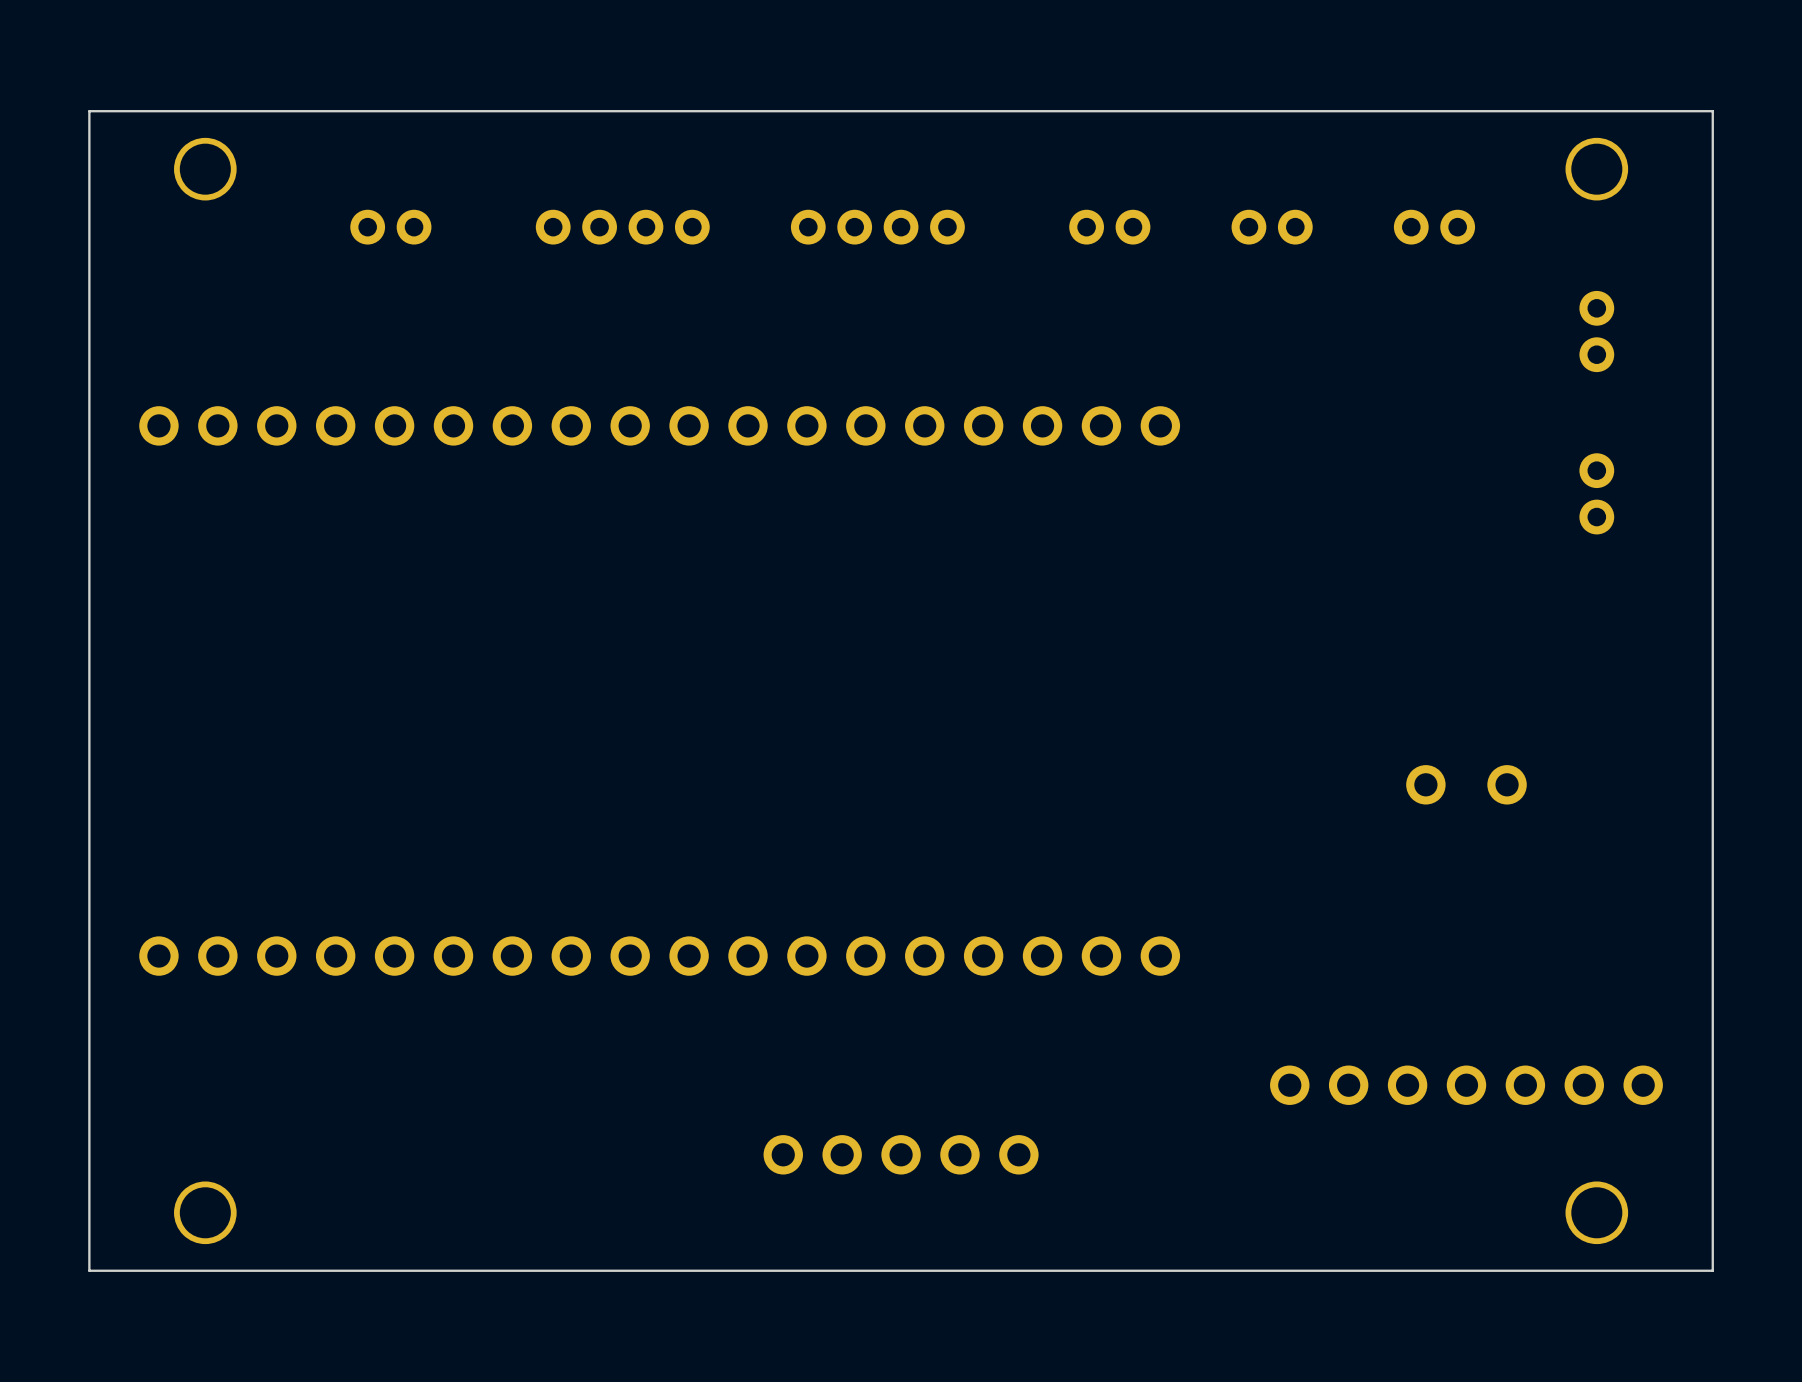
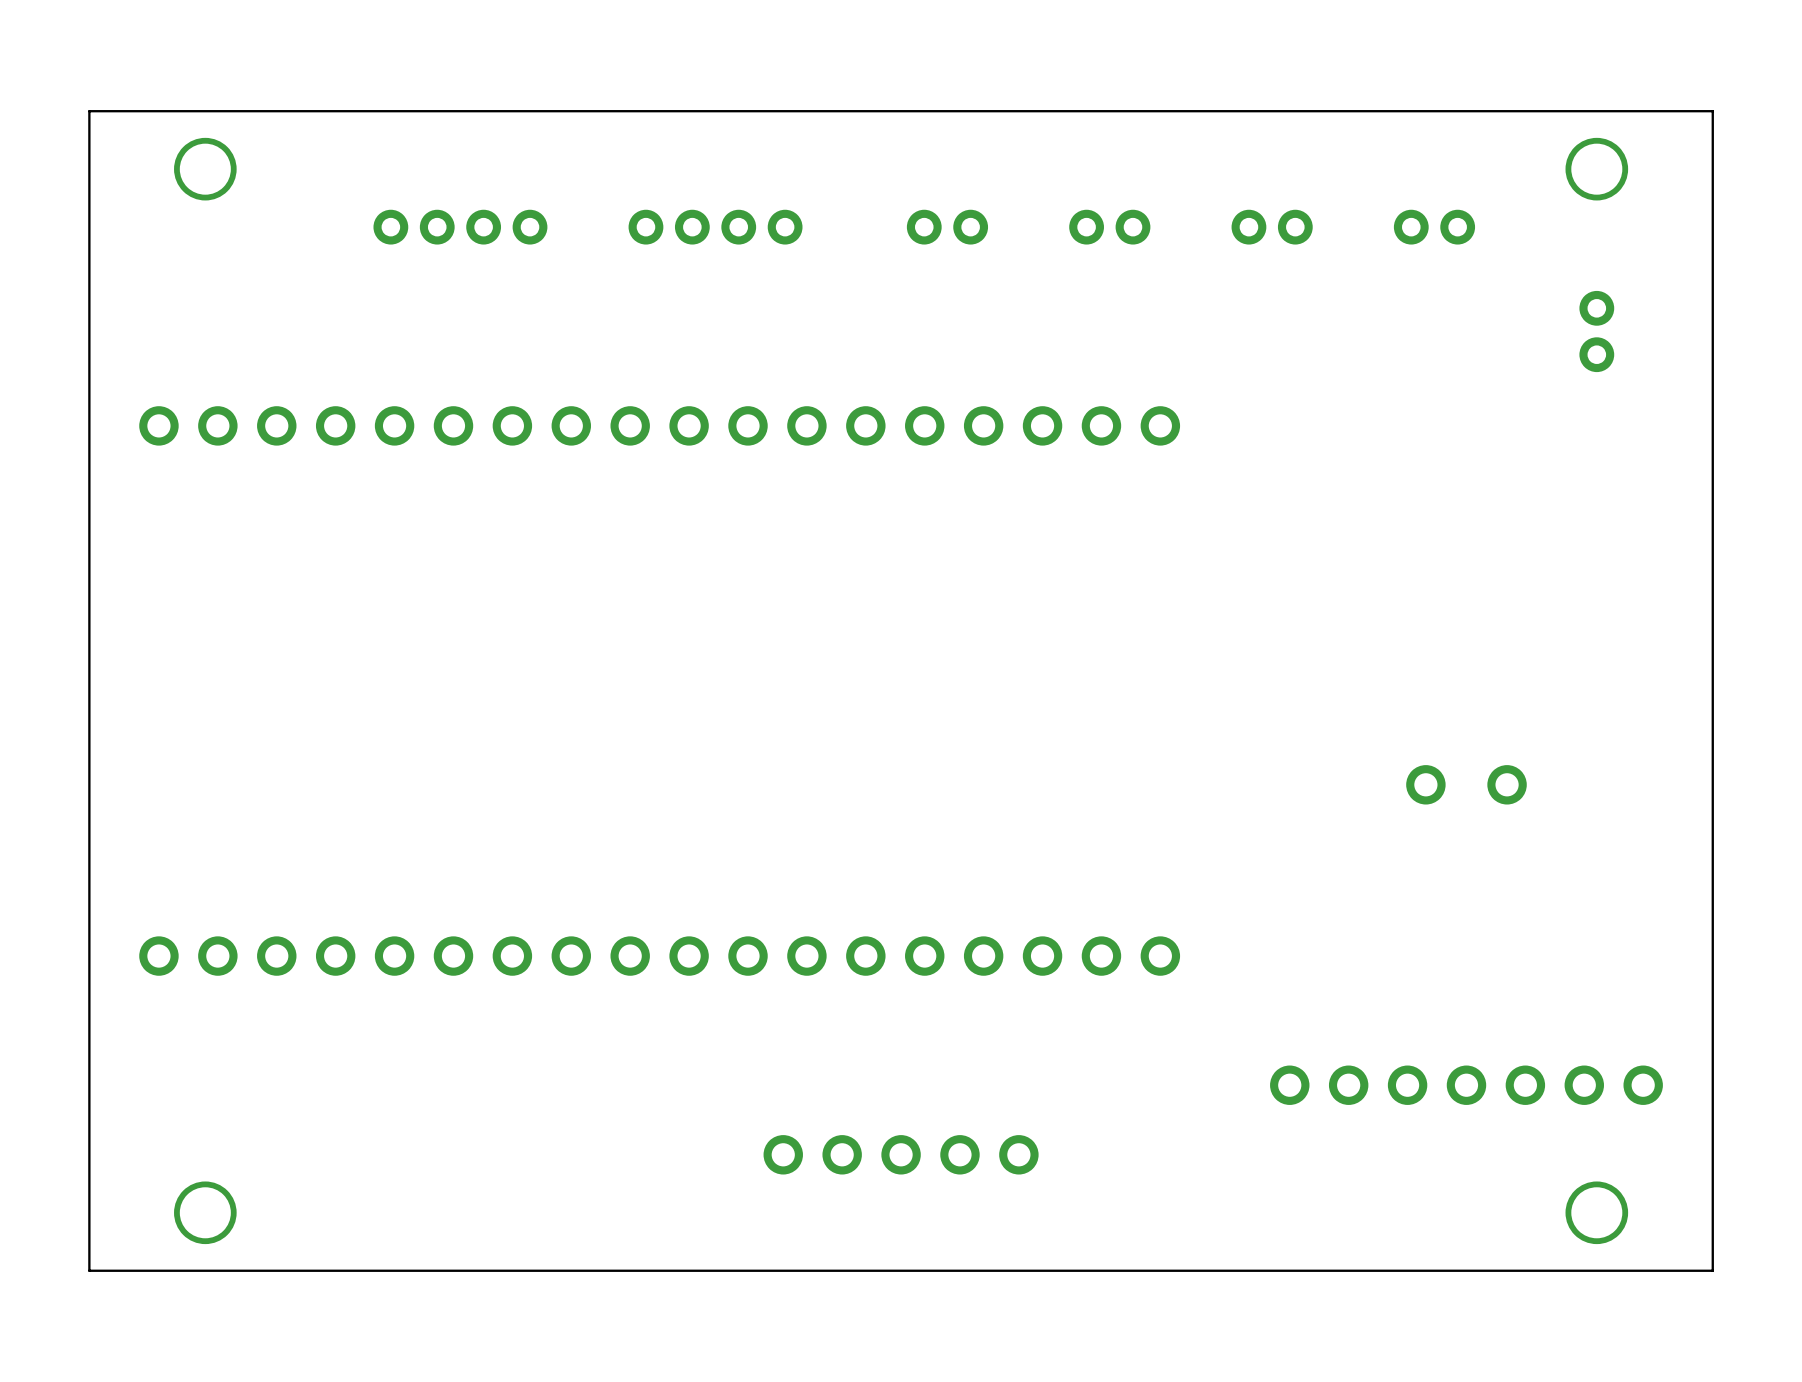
part: (390, 227) -> none
part: none -> (460, 227)
part: (622, 227) -> none
part: none -> (715, 227)
part: (877, 227) -> none
part: none -> (947, 227)
part: (1596, 493) -> none

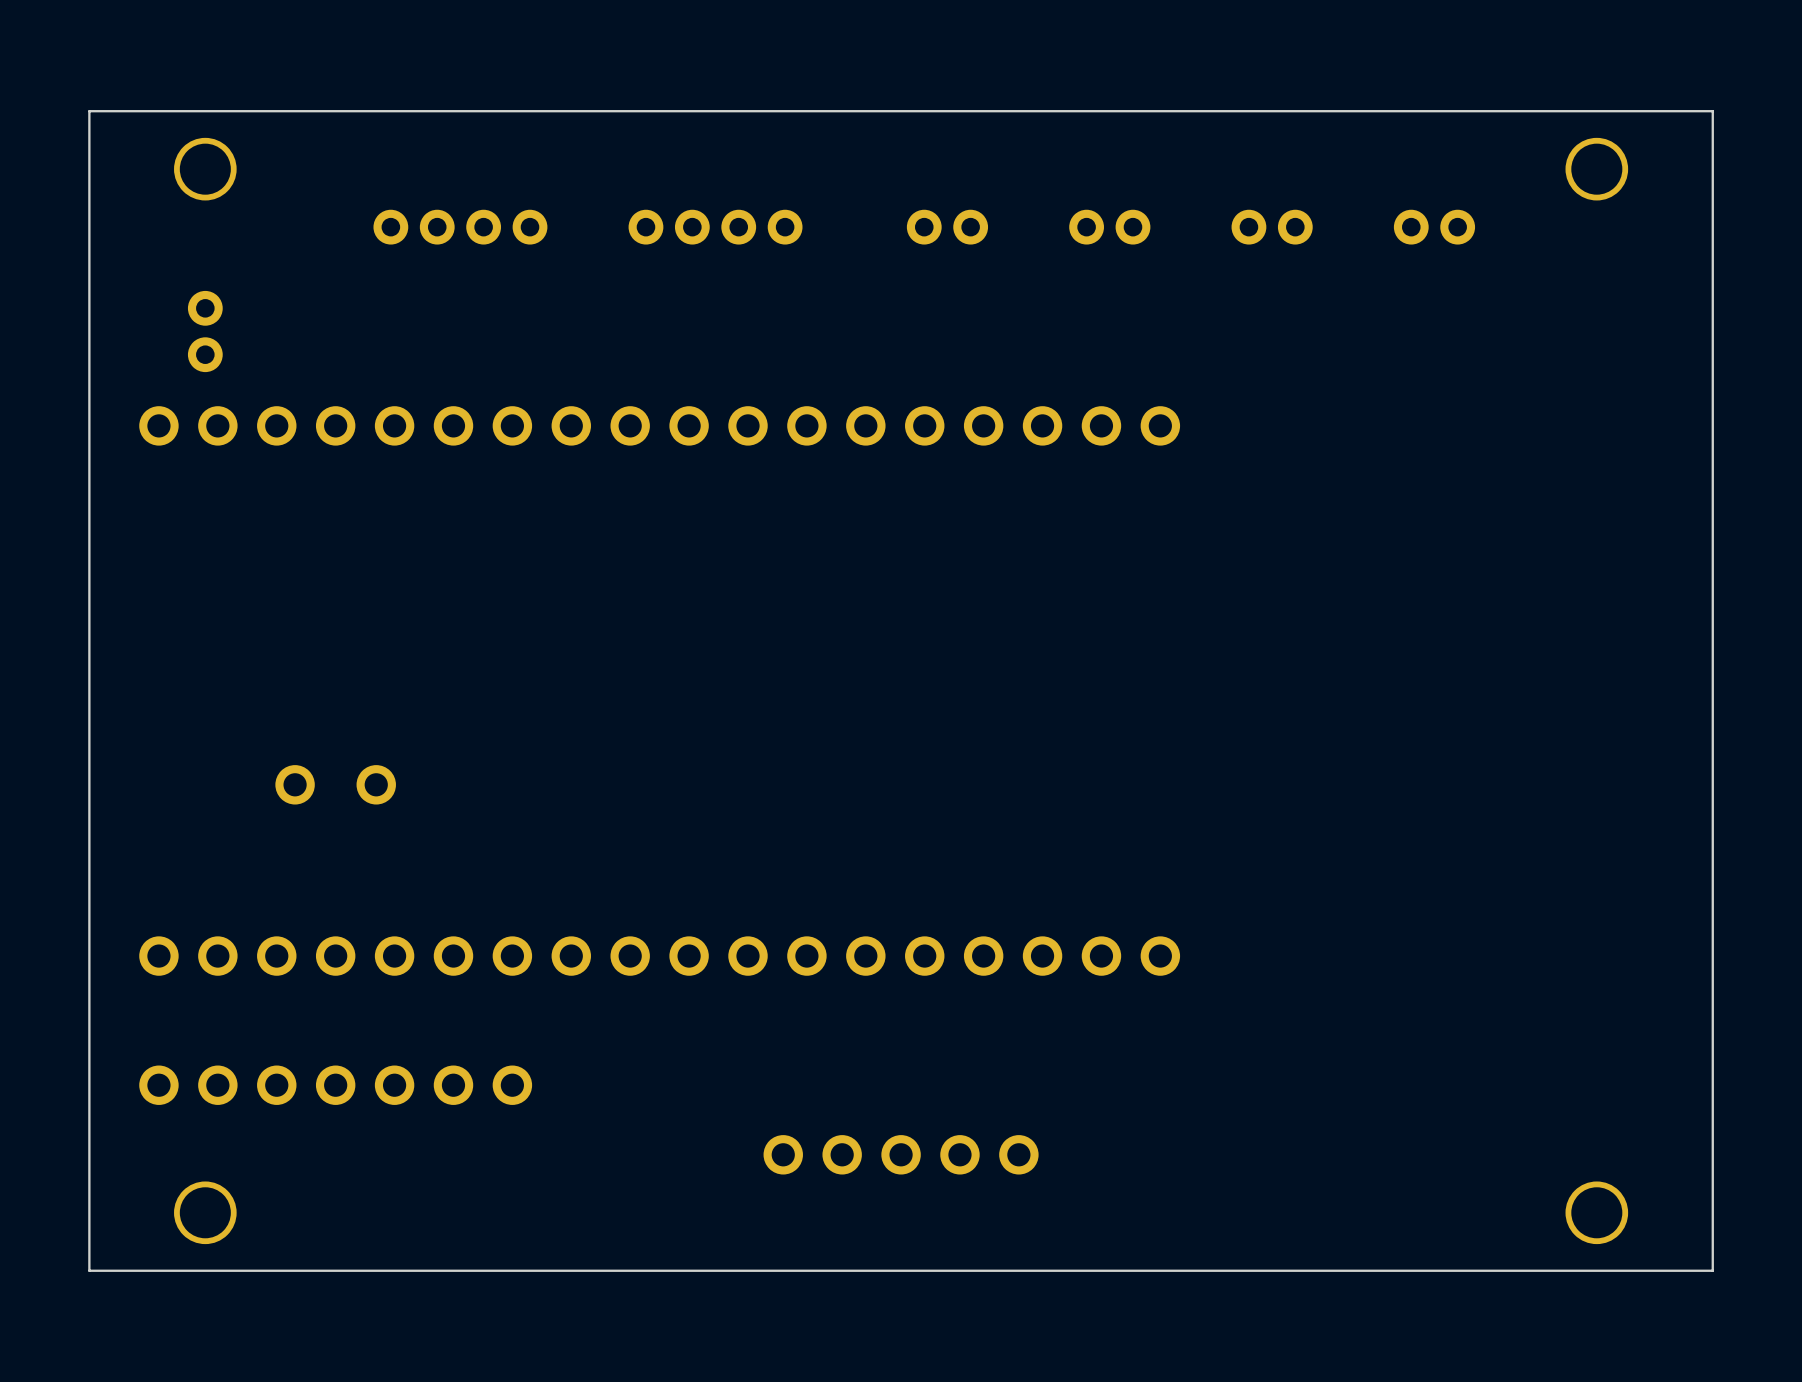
part: none -> (205, 331)
part: (1596, 331) -> none
part: none -> (335, 784)
part: (1466, 784) -> none
part: none -> (335, 1085)
part: (1466, 1085) -> none

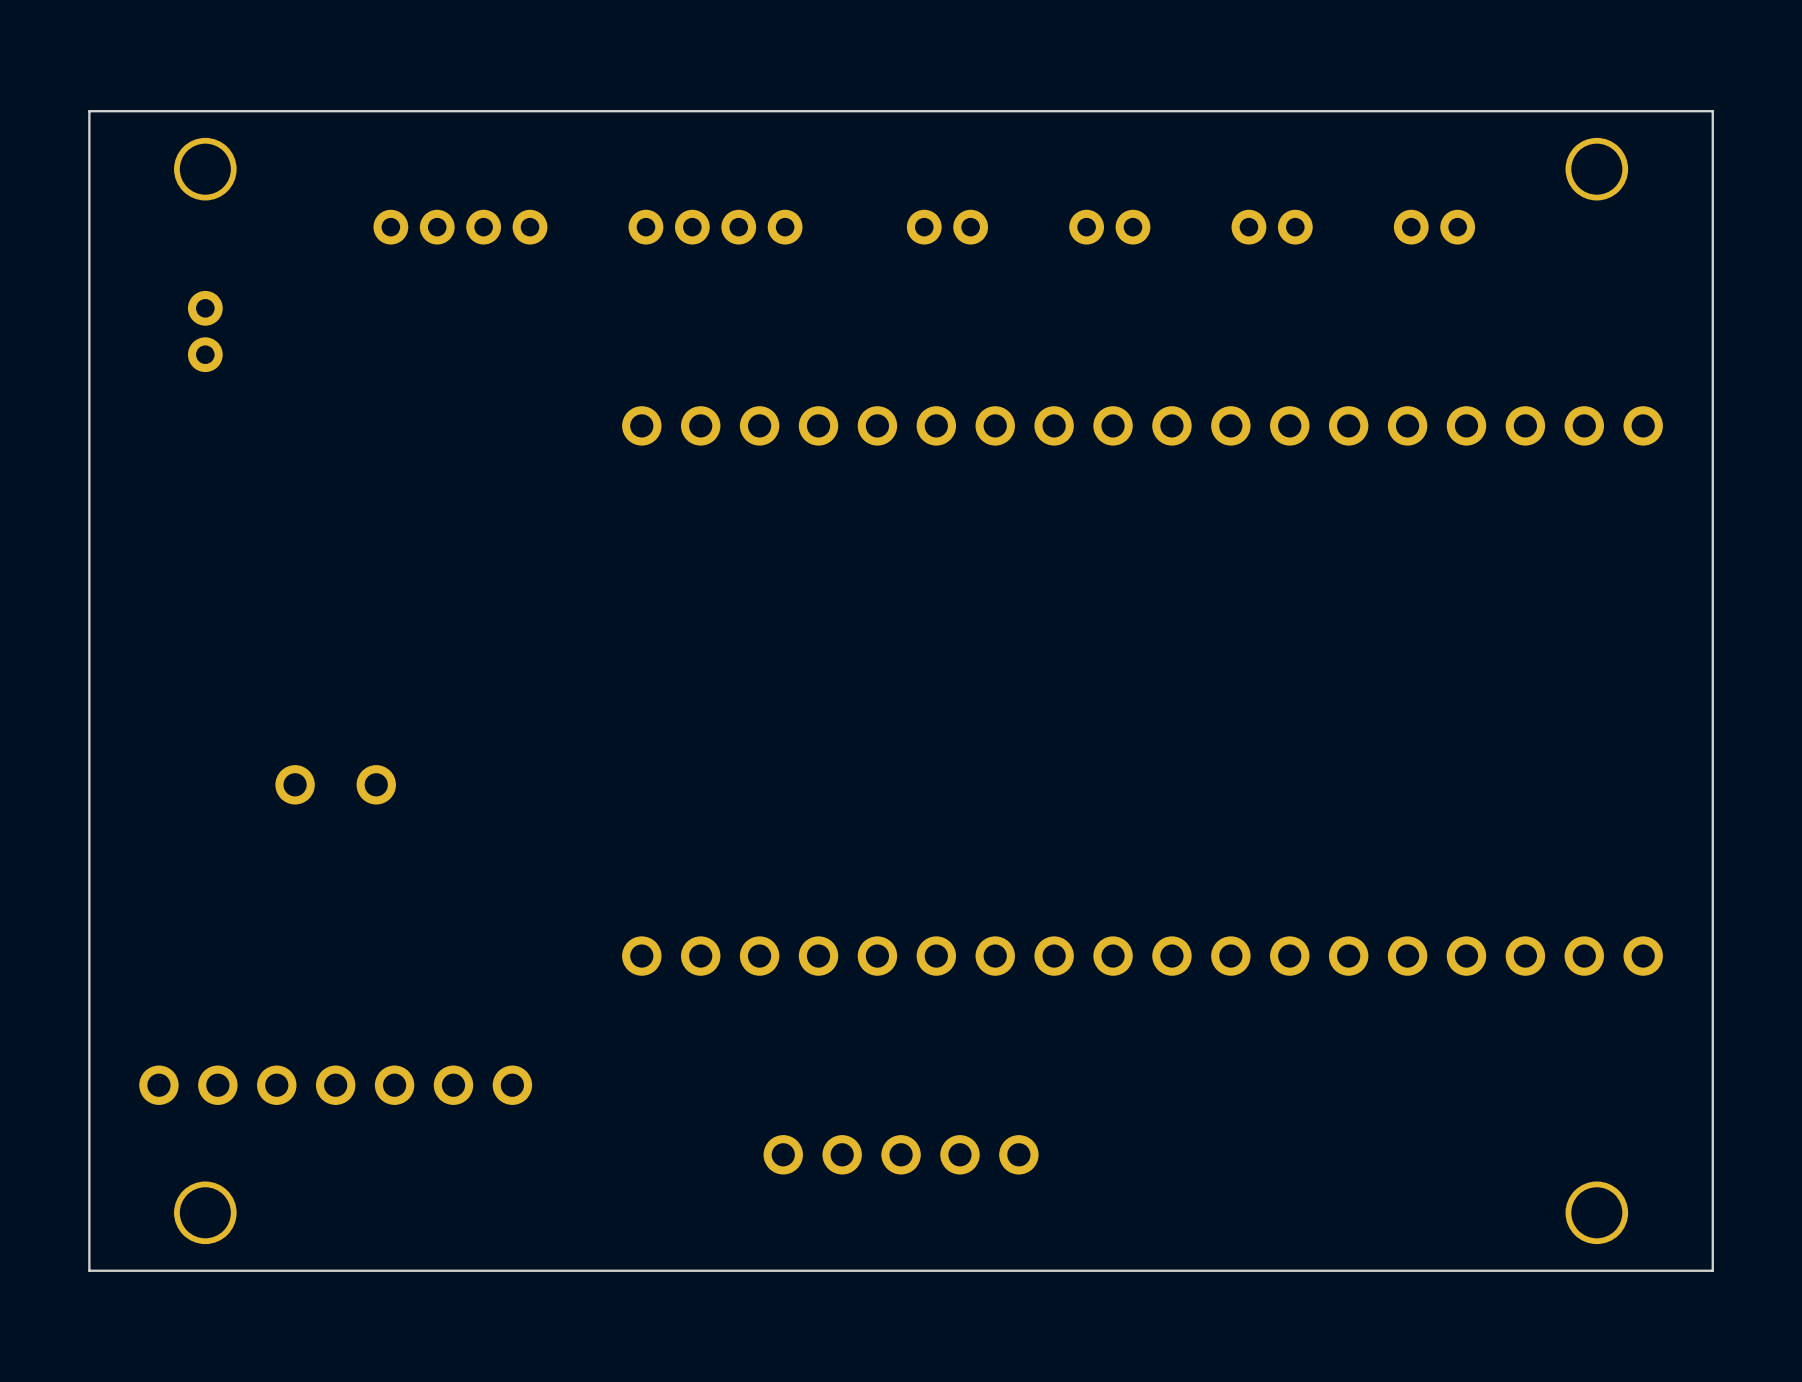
part: (659, 425) -> none
part: none -> (1142, 425)
part: (659, 956) -> none
part: none -> (1142, 956)

